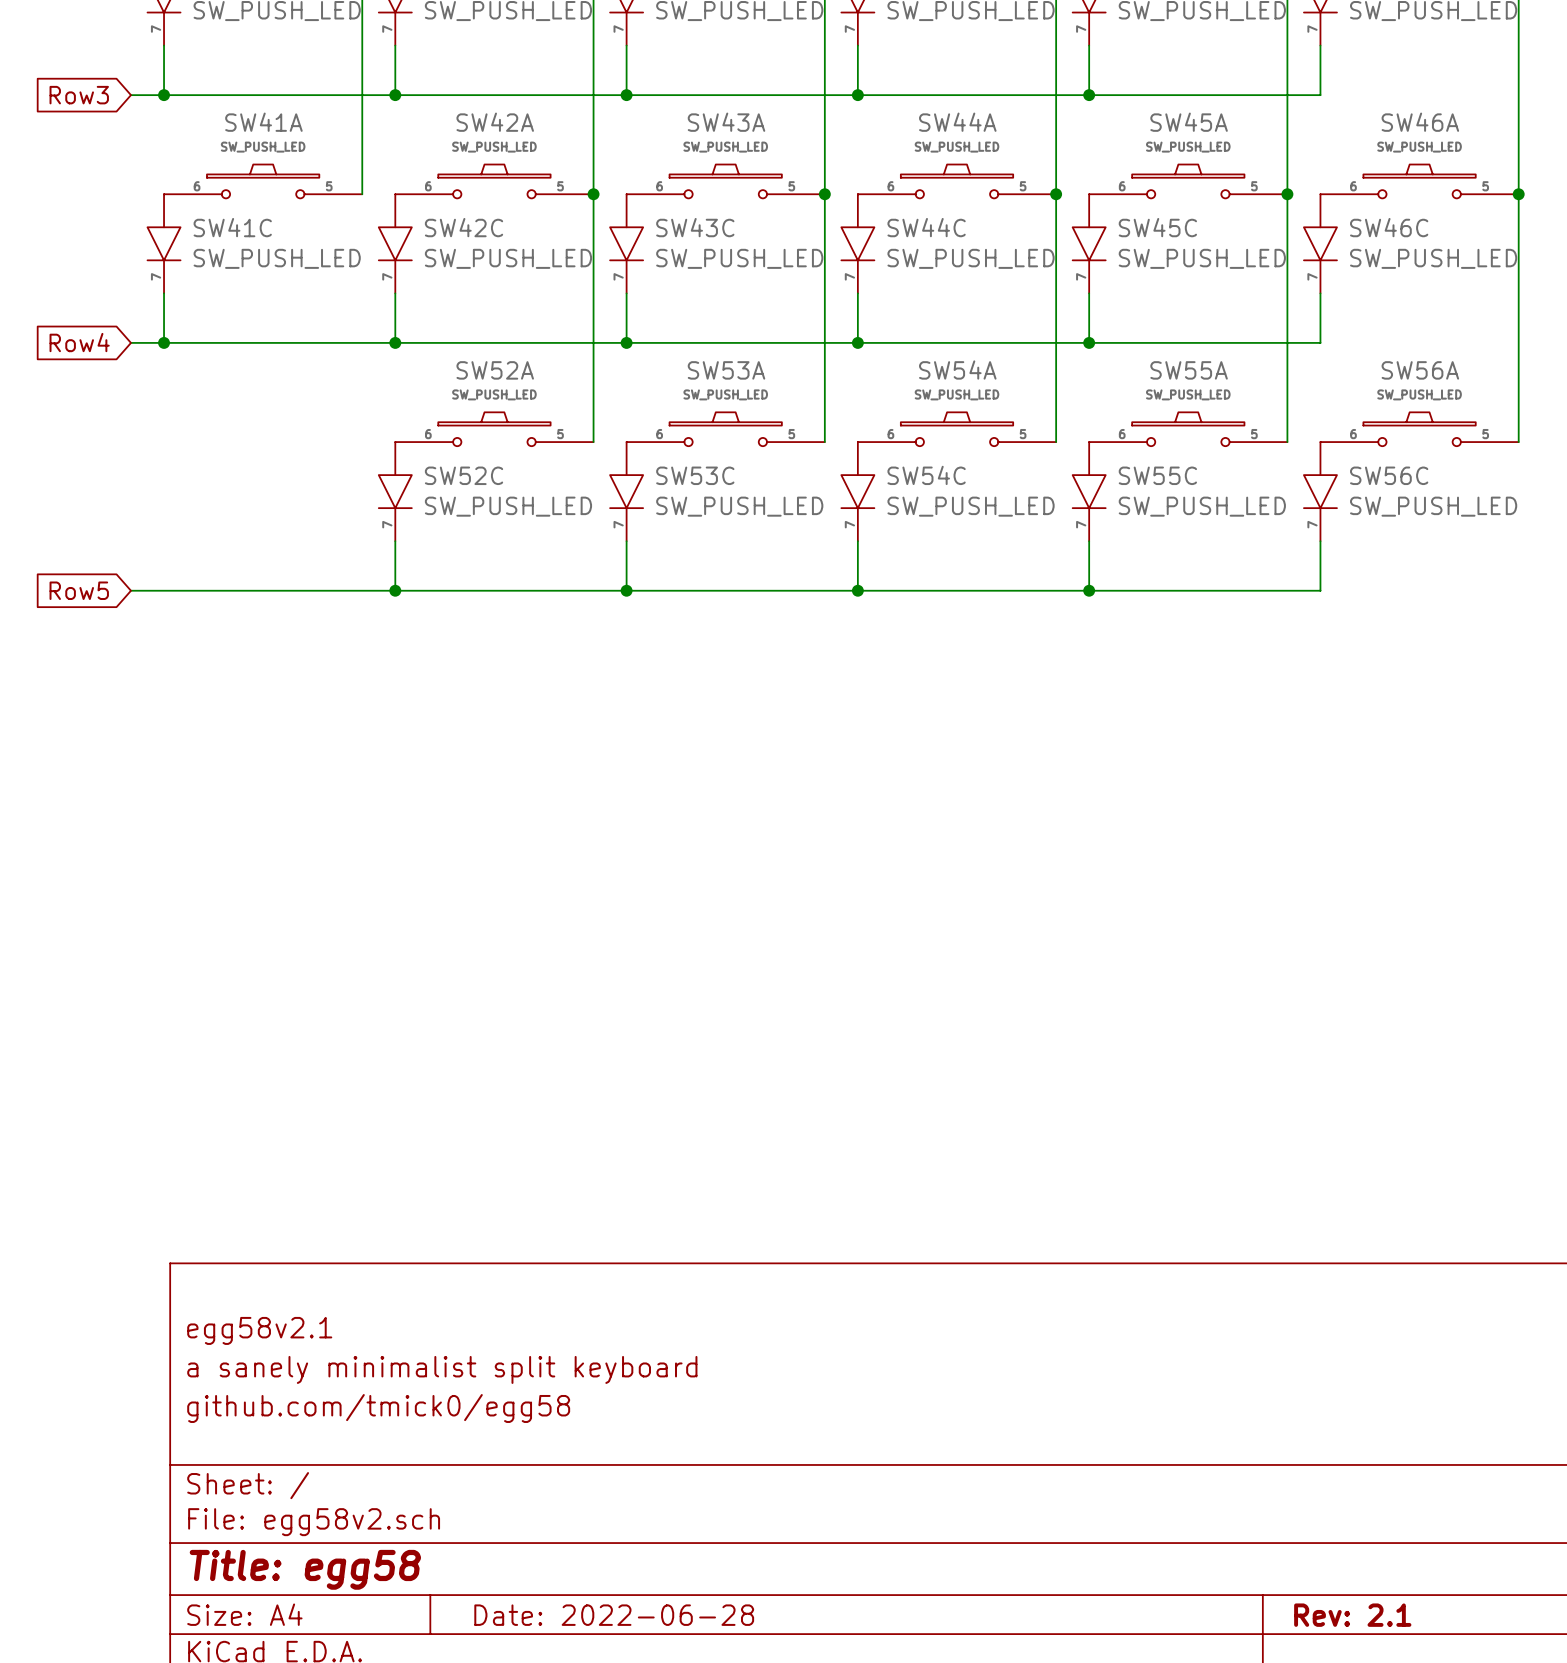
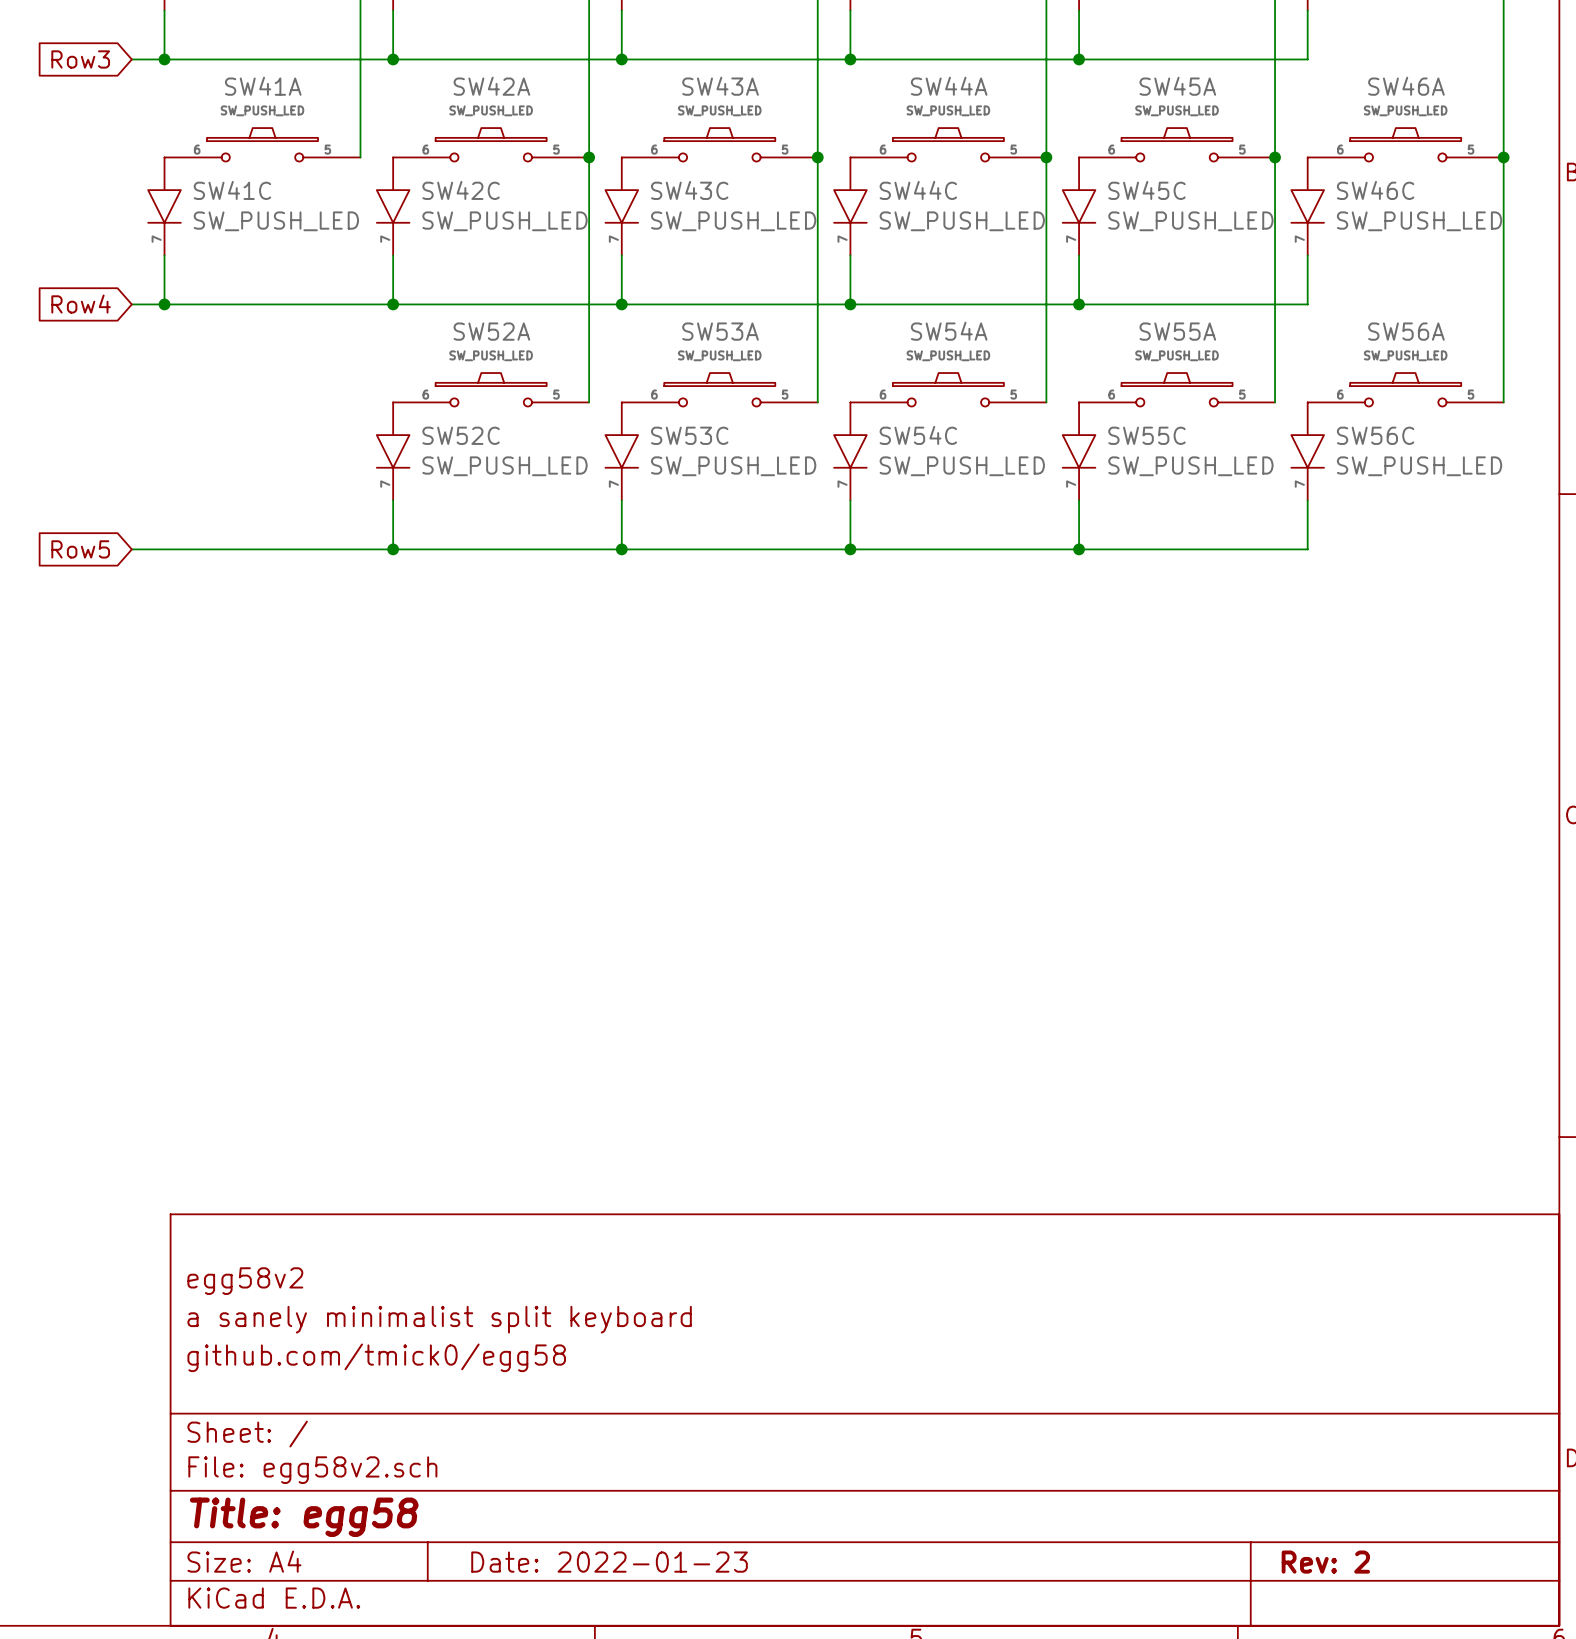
title block: egg58v2.1 (259, 1330) -> egg58v2 (245, 1281)
title block: Date: 2022-06-28 (614, 1615) -> Date: 2022-01-23 (609, 1562)
title block: Rev: 2.1 (1352, 1615) -> Rev: 2 (1325, 1562)

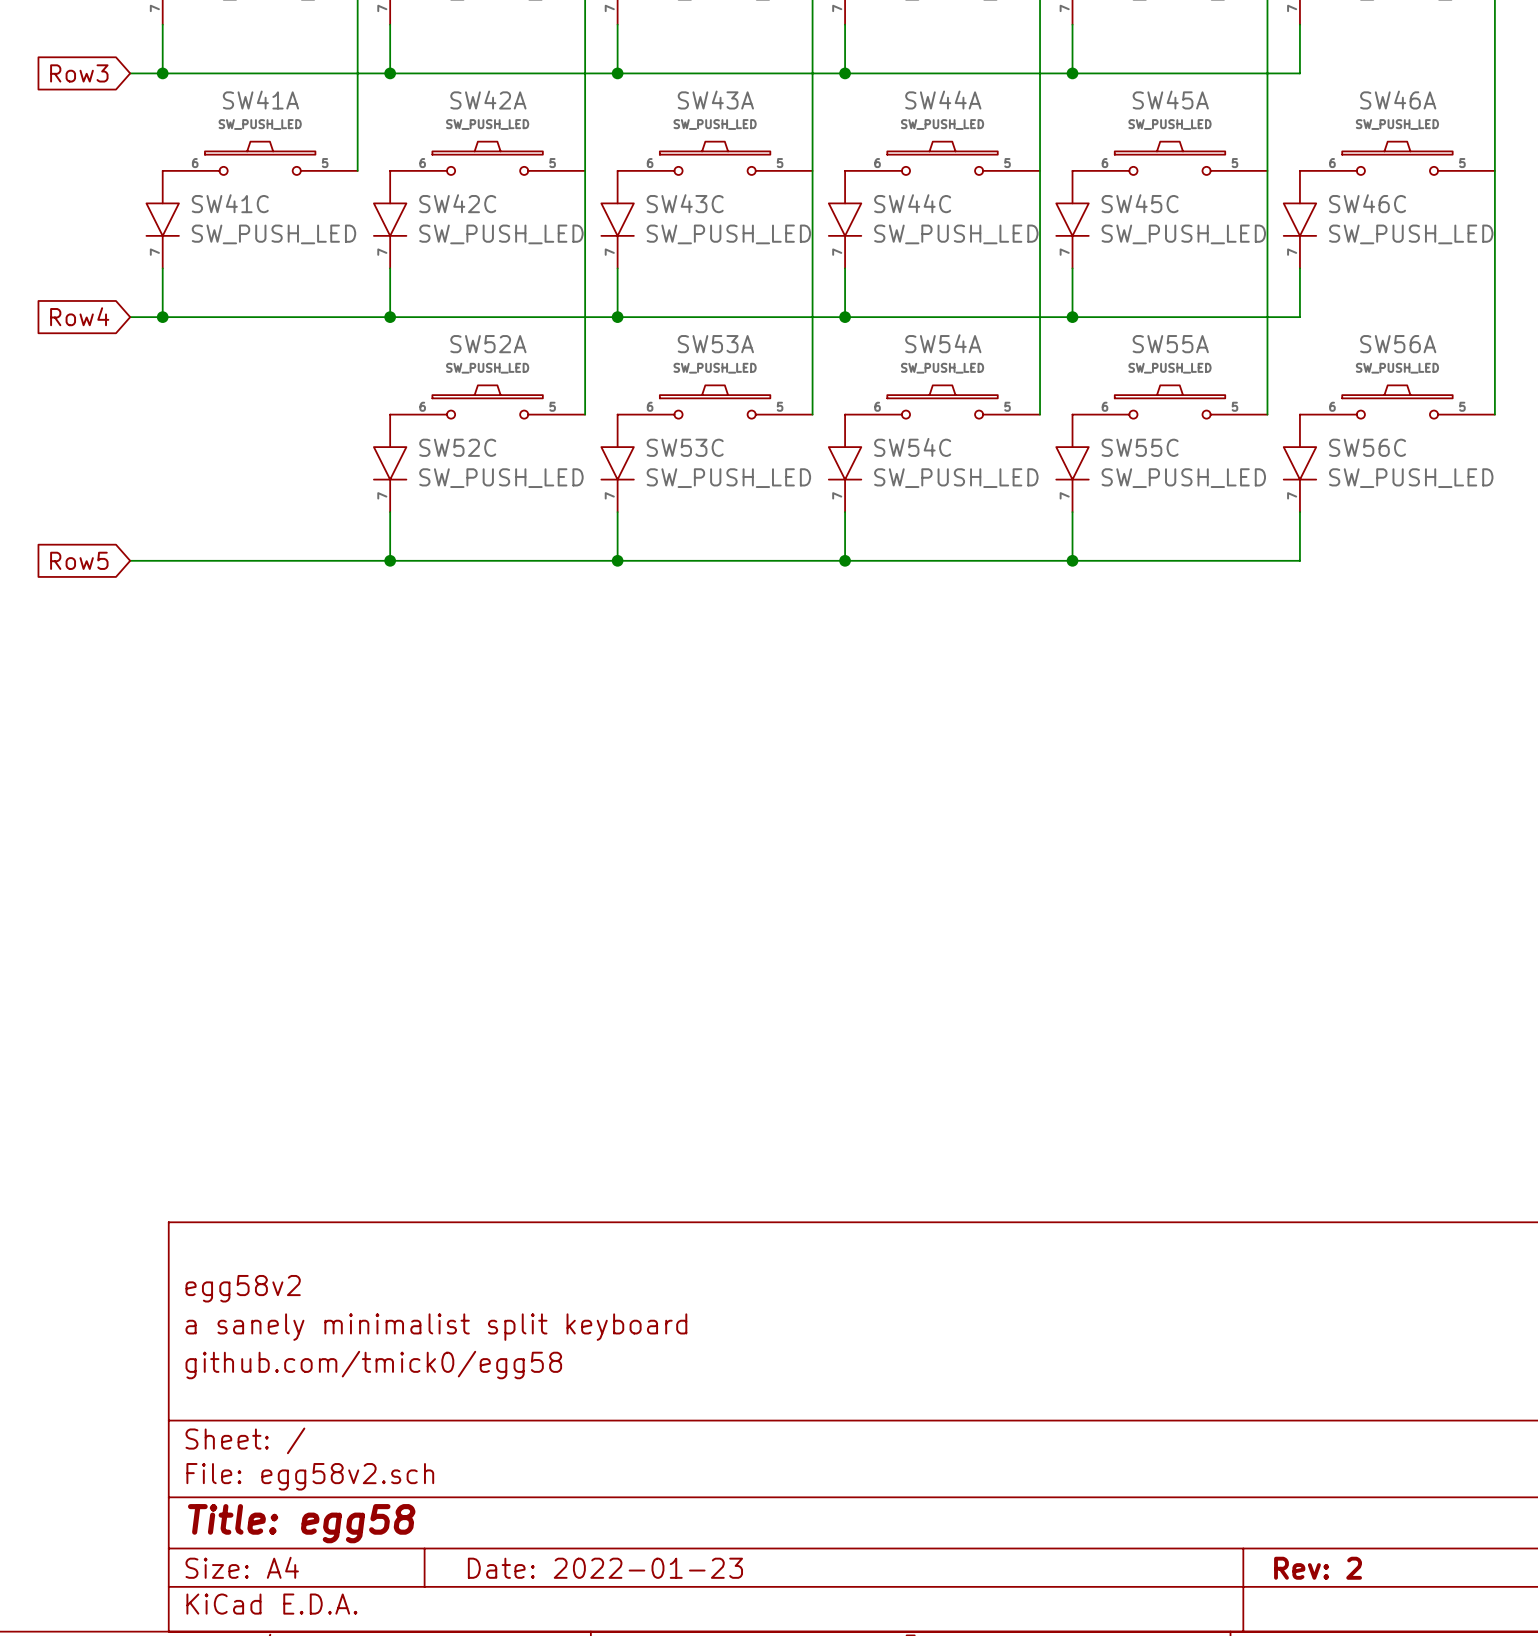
junction: (589, 157) -> none
junction: (817, 157) -> none
junction: (1046, 157) -> none
junction: (1275, 157) -> none
junction: (1503, 157) -> none

